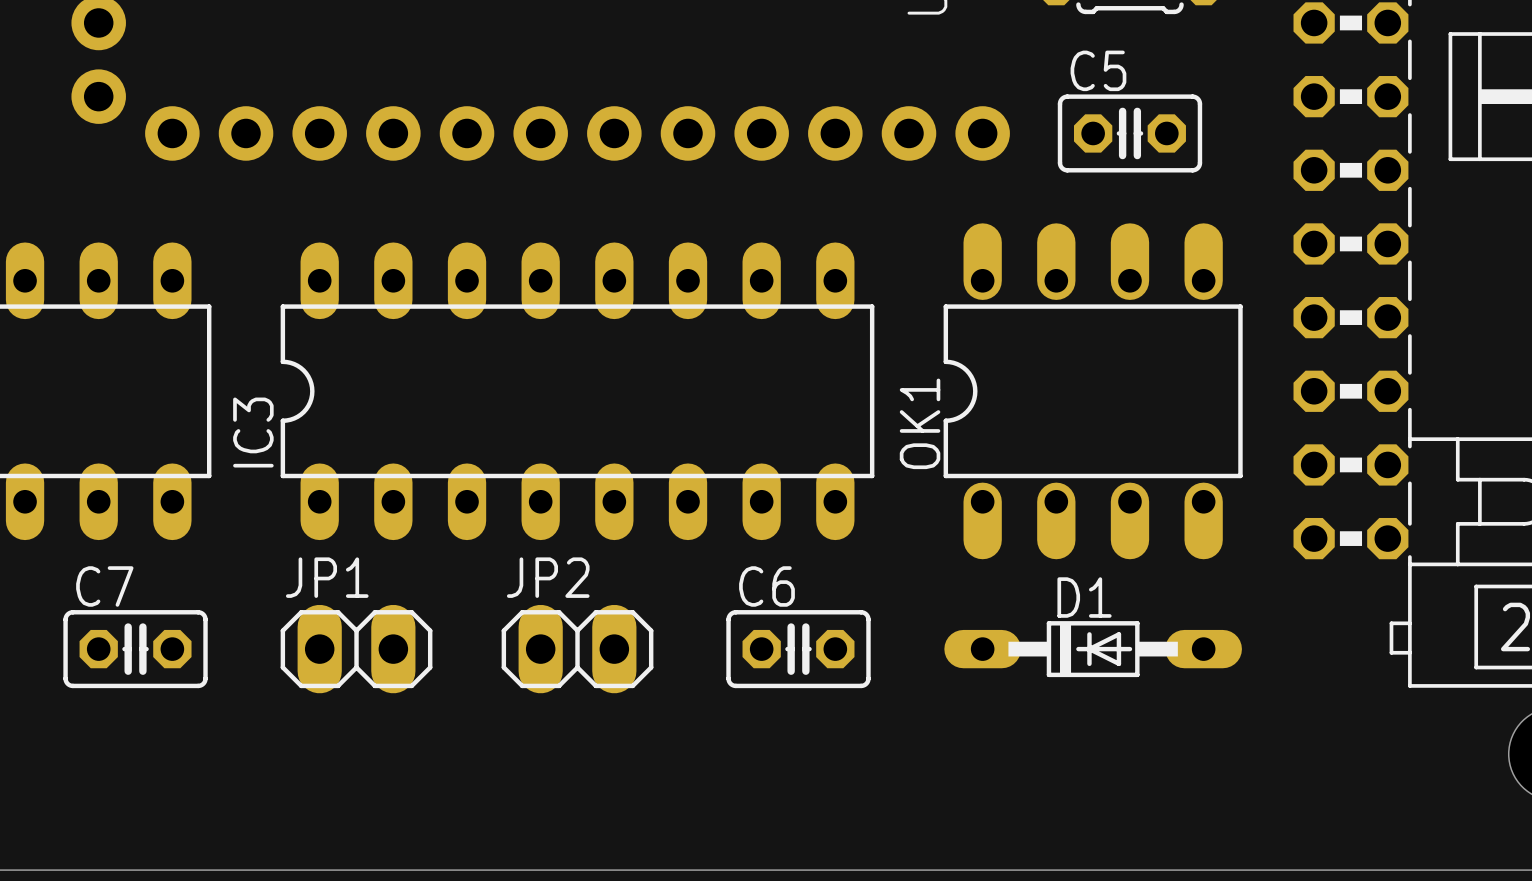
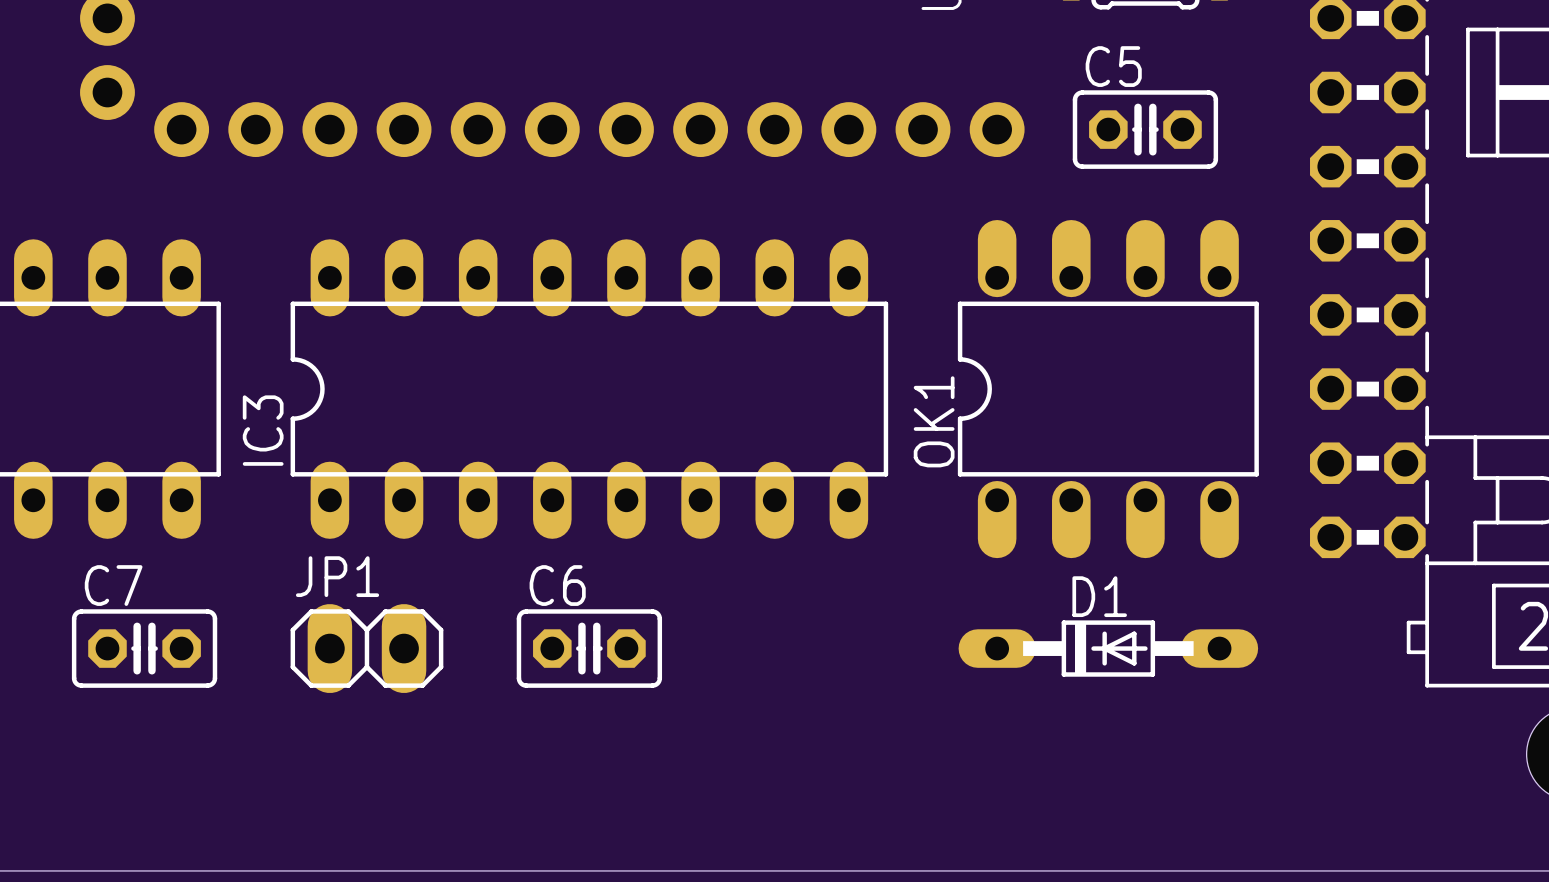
JP2: (577, 649) -> none
C6 position: (798, 649) -> (589, 648)

